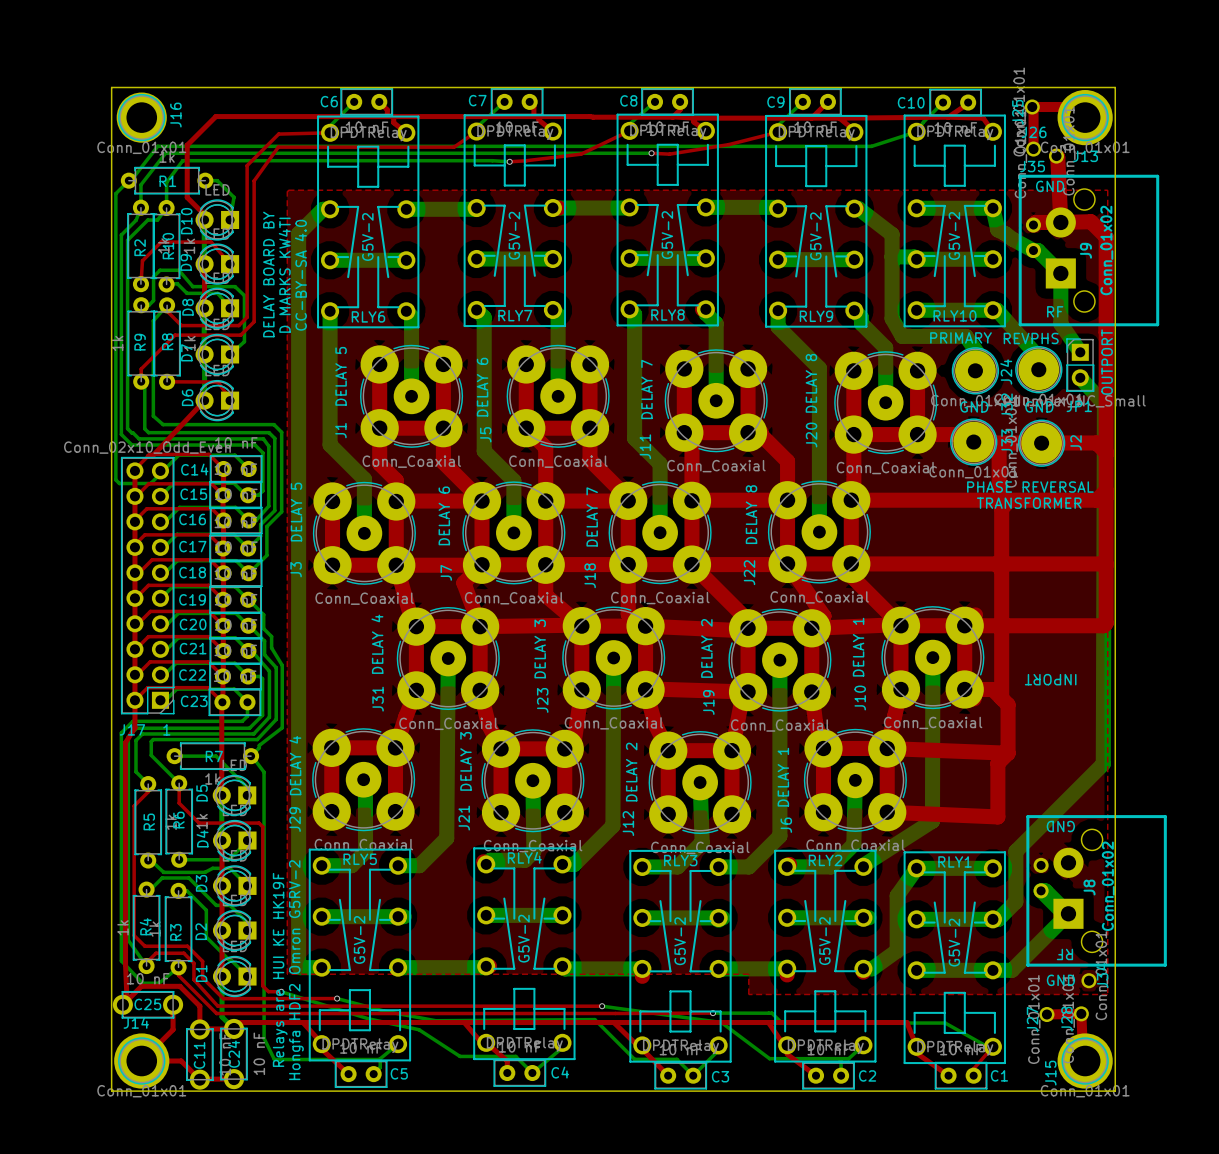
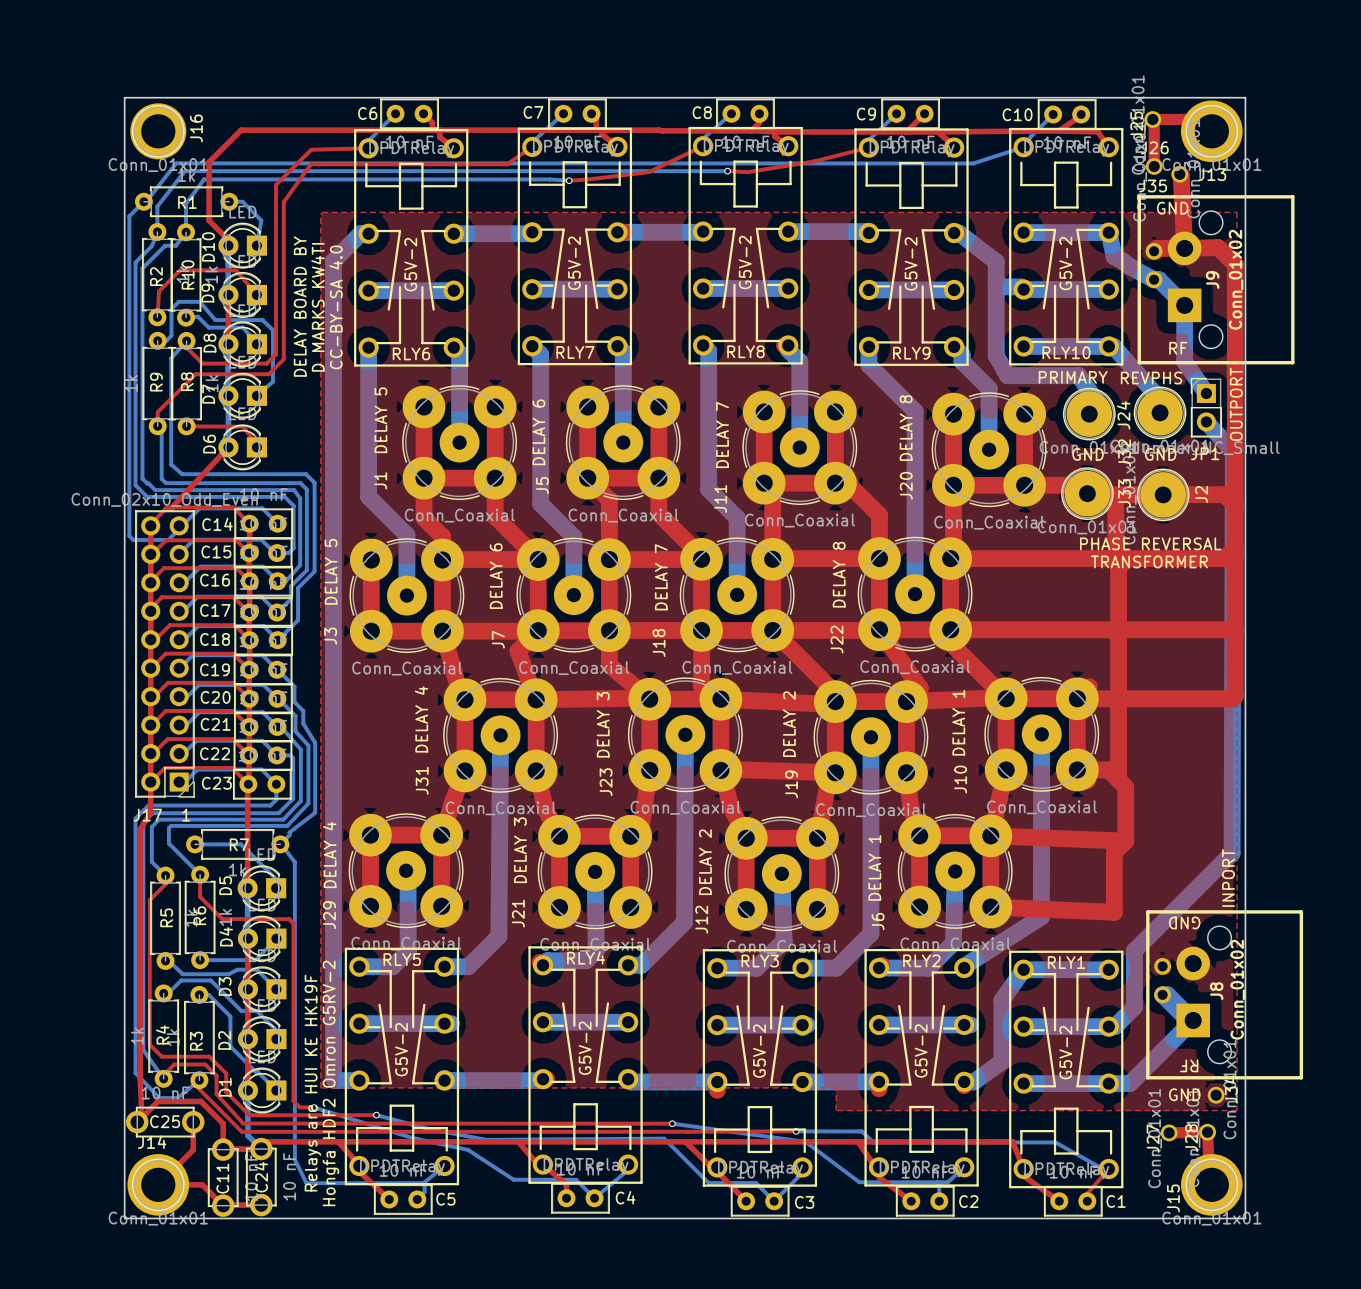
text rotation: 0° (1050, 679) -> 90° clockwise (1228, 878)
text position: INPORT (1050, 679) -> INPORT (1228, 878)

